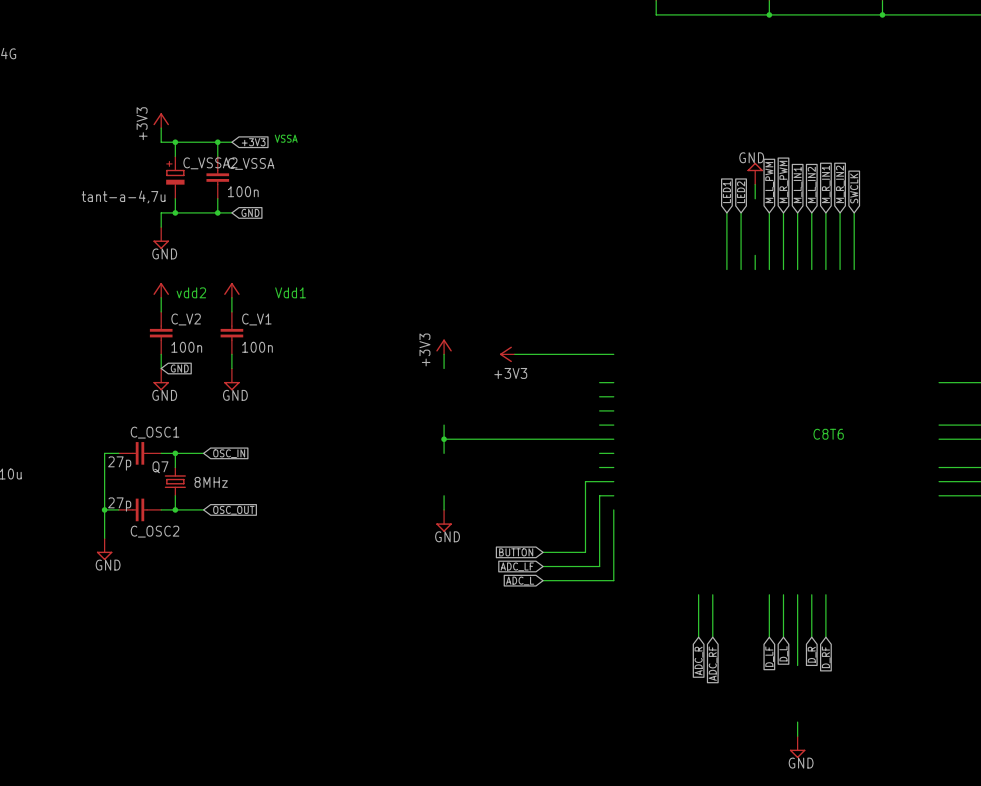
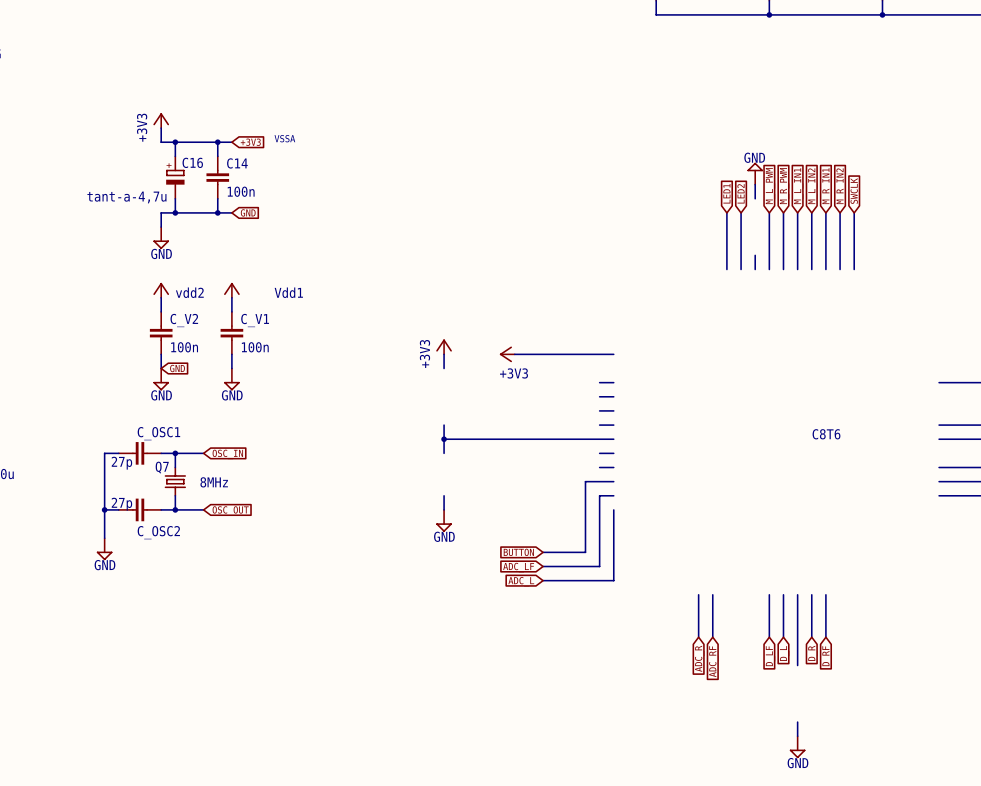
C_VSSA2 name: C_VSSA2 (210, 163) -> C16 (192, 162)
C_VSSA name: C_VSSA (251, 163) -> C14 (237, 163)

